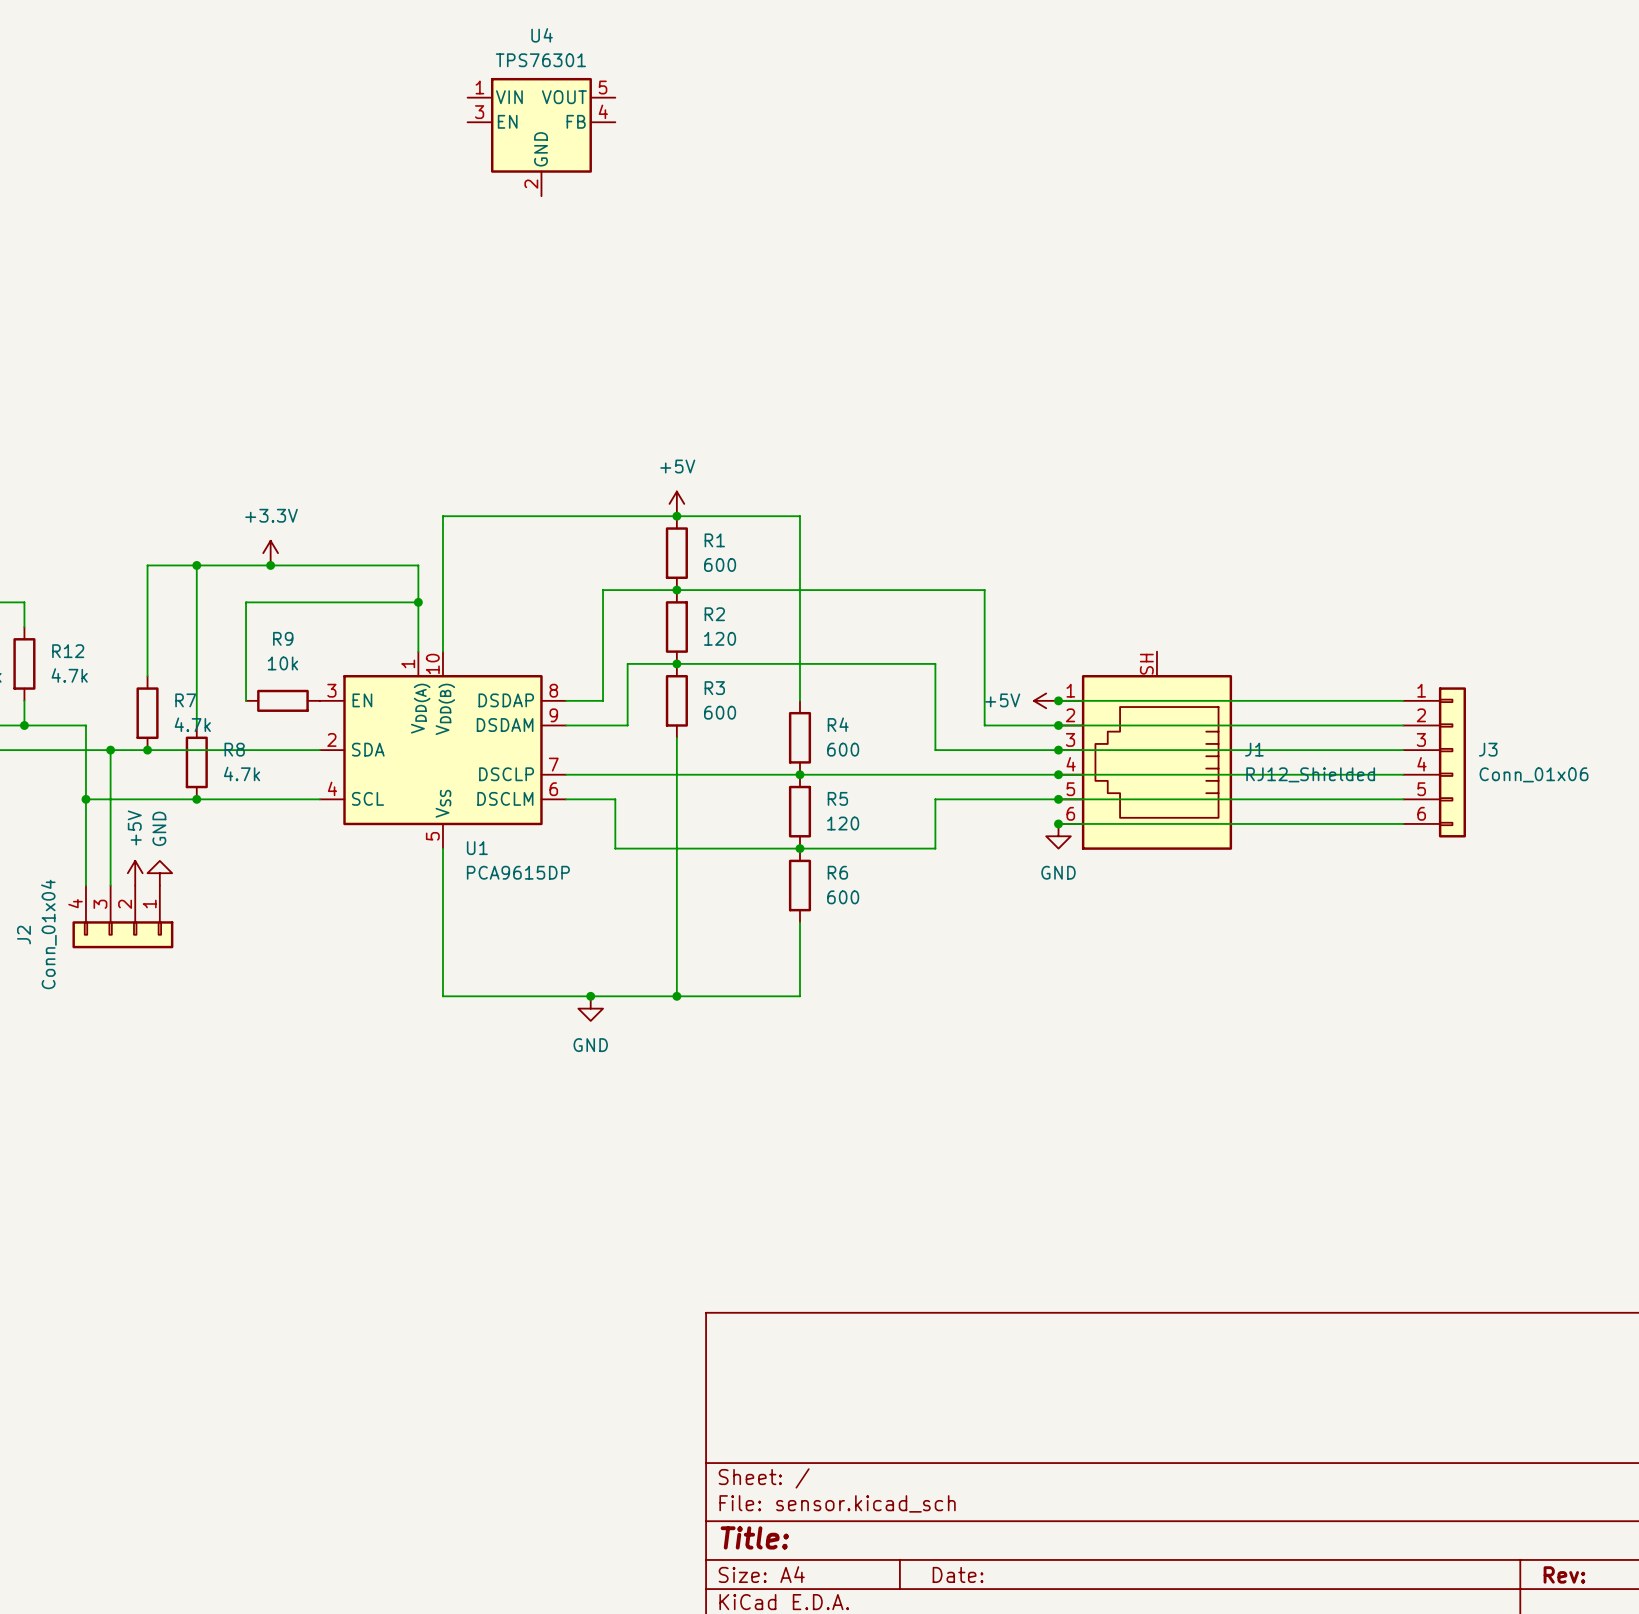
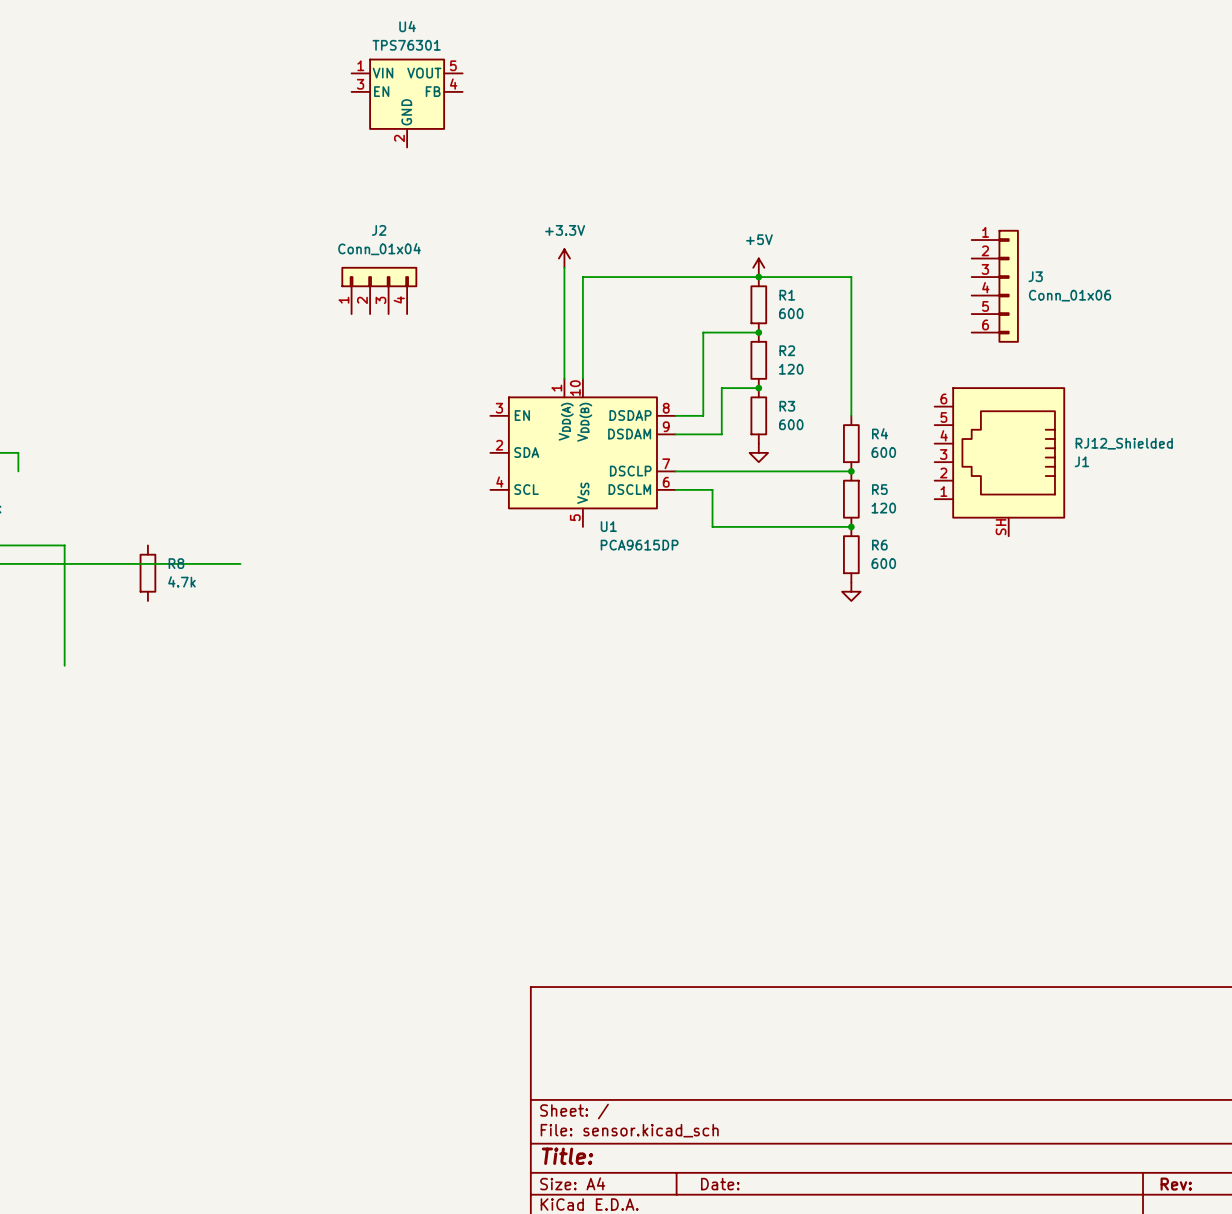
power symbol: none -> +3.3V (564, 258)
wire: none -> (564, 267) (564, 378)
power symbol: none -> +5V (758, 267)
junction: none -> (758, 277)
wire: none -> (758, 332) (703, 332) (703, 415) (675, 415)
junction: none -> (758, 332)
power symbol: +5V (676, 503) -> none
wire: none -> (582, 378) (582, 277) (851, 277) (851, 415)
junction: (676, 516) -> none
wire: none -> (758, 388) (721, 388) (721, 434) (675, 434)
junction: none -> (758, 388)
power symbol: +3.3V (270, 553) -> none
R1 position: (676, 553) -> (758, 304)
wire: (196, 565) (196, 725) -> none
junction: (196, 565) -> none
junction: (270, 565) -> none
junction: (676, 590) -> none
wire: (418, 602) (246, 602) (246, 700) -> none
junction: (418, 602) -> none
power symbol: none -> (758, 452)
R2 position: (676, 627) -> (758, 360)
wire: none -> (675, 471) (851, 471)
junction: none -> (851, 471)
wire: (418, 651) (418, 565) (147, 565) (147, 676) -> none
wire: (442, 651) (442, 516) (799, 516) (799, 700) -> none
wire: none -> (675, 489) (712, 489) (712, 526) (795, 526)
R12: 4.7k (24, 663) -> none
junction: (676, 663) -> none
wire: (24, 700) (24, 725) -> none
R9: 10k (282, 700) -> none
wire: (566, 700) (603, 700) (603, 590) (984, 590) (984, 725) (1403, 725) -> none
R3 position: (676, 700) -> (758, 415)
power symbol: +5V (1046, 700) -> none
junction: (1058, 700) -> none
wire: (1132, 700) (1403, 700) -> none
junction: none -> (851, 526)
R7: 4.7k (147, 713) -> none
junction: (24, 725) -> none
wire: (566, 725) (627, 725) (627, 663) (935, 663) (935, 750) (1403, 750) -> none
junction: (1058, 725) -> none
wire: (676, 737) (676, 996) -> none
R4 position: (799, 737) -> (851, 443)
wire: (110, 750) (110, 885) -> none
junction: (110, 750) -> none
junction: (147, 750) -> none
U1 position: (442, 750) -> (582, 452)
junction: (1058, 750) -> none
J1 position: (1145, 750) -> (999, 461)
J1 flip: as is (1156, 762) -> up-down (1008, 452)
J3 position: (1434, 762) -> (995, 286)
wire: (566, 774) (1403, 774) -> none
junction: (799, 774) -> none
junction: (1058, 774) -> none
power symbol: none -> (851, 591)
wire: (85, 799) (319, 799) -> none
junction: (85, 799) -> none
junction: (196, 799) -> none
wire: (566, 799) (615, 799) (615, 848) (935, 848) (935, 799) (1403, 799) -> none
junction: (1058, 799) -> none
R5 position: (799, 811) -> (851, 499)
wire: (1058, 823) (1403, 823) -> none
junction: (1058, 823) -> none
power symbol: GND (1058, 836) -> none
wire: (442, 848) (442, 996) (799, 996) (799, 922) -> none
junction: (799, 848) -> none
power symbol: +5V (135, 873) -> none
power symbol: GND (159, 873) -> none
R6 position: (799, 885) -> (851, 554)
J2 position: (122, 916) -> (379, 290)
J2 value position: Conn_01x04 (48, 934) -> Conn_01x04 (379, 249)
J2 rotation: 0° (122, 934) -> 180° (379, 277)
J2 name position: J2 (23, 935) -> J2 (379, 230)
junction: (590, 996) -> none
junction: (676, 996) -> none
power symbol: GND (590, 1008) -> none

